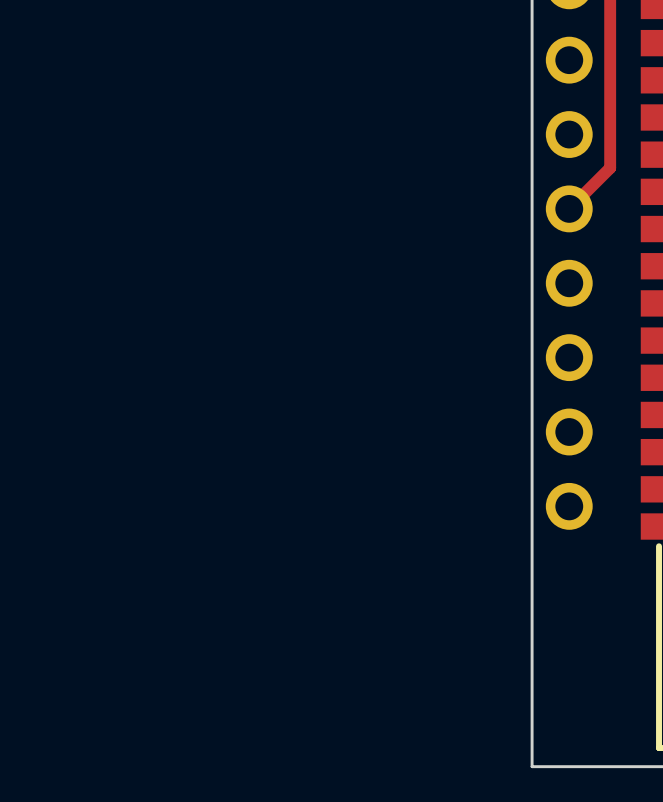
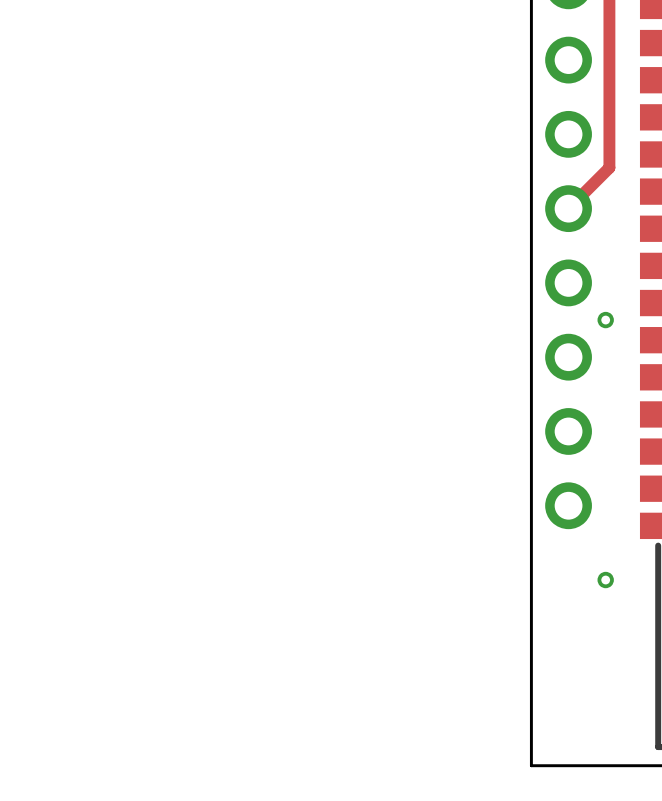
via: none -> (605, 320)
via: none -> (605, 580)

